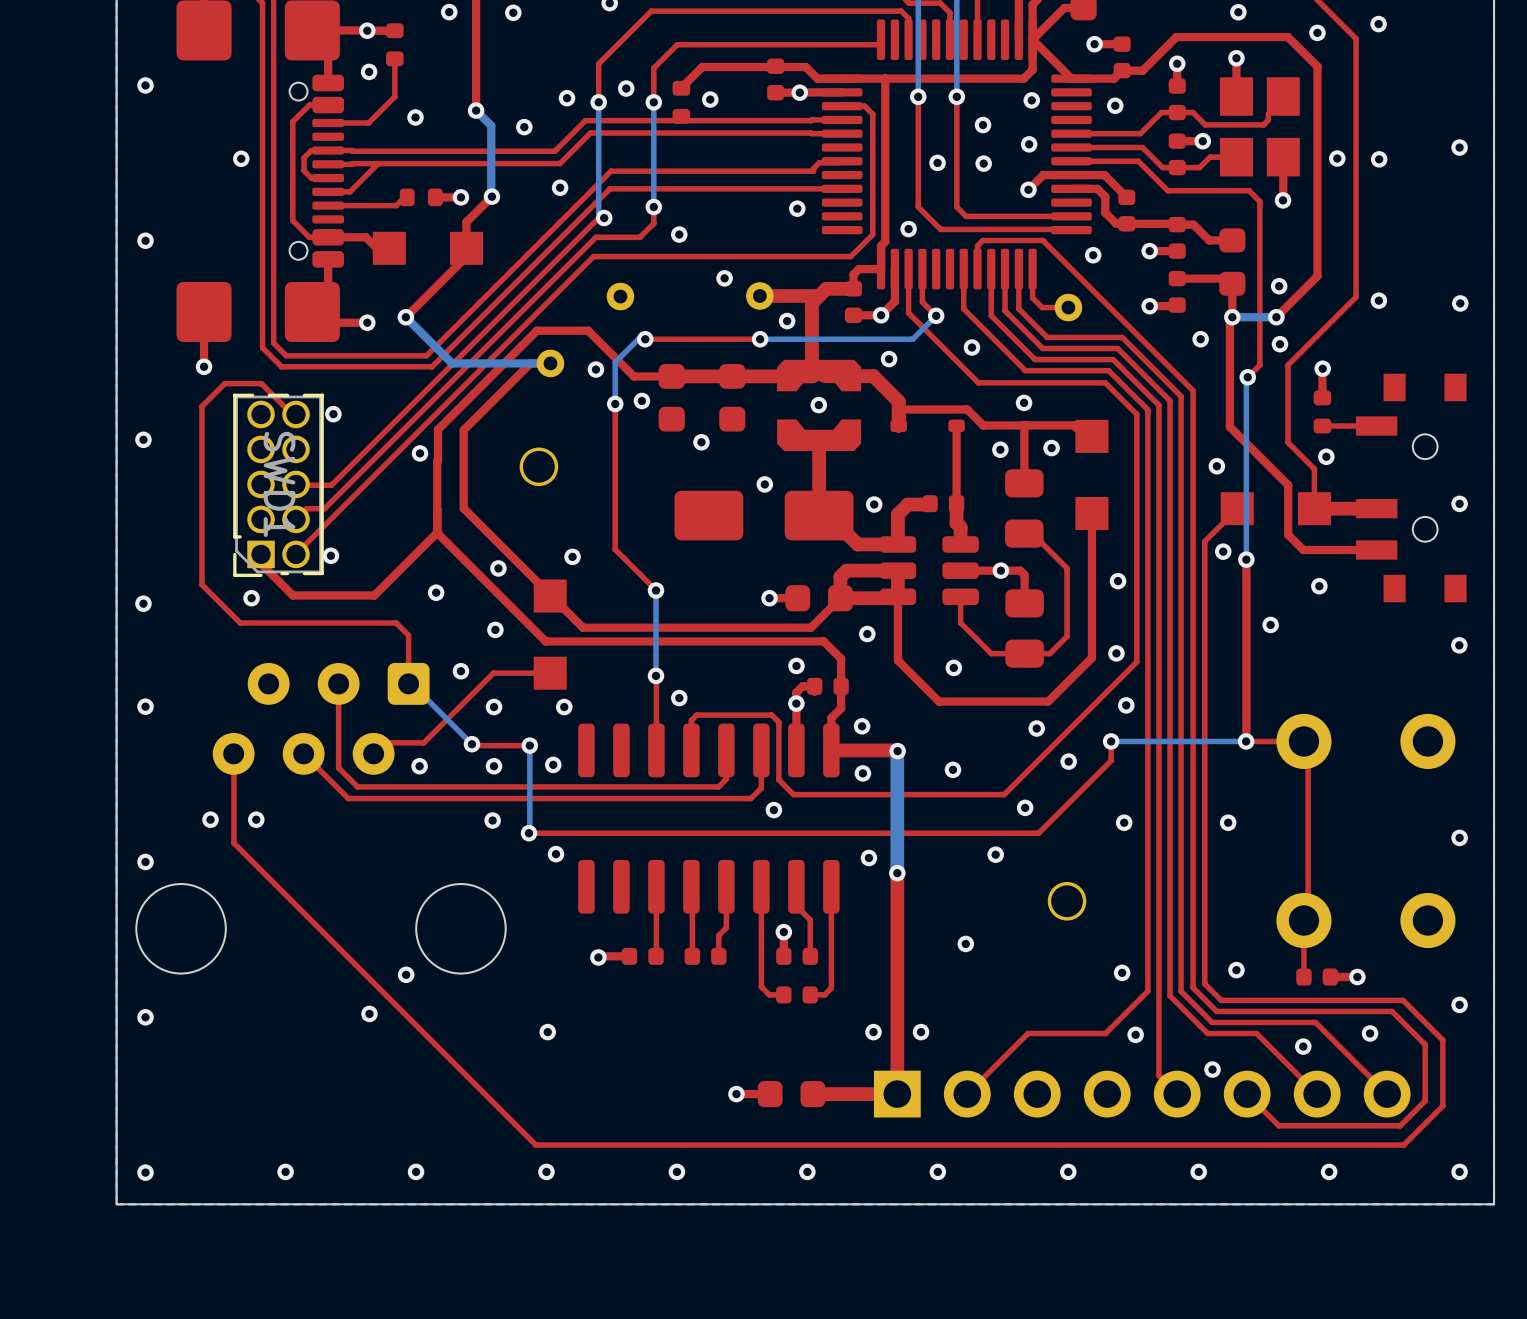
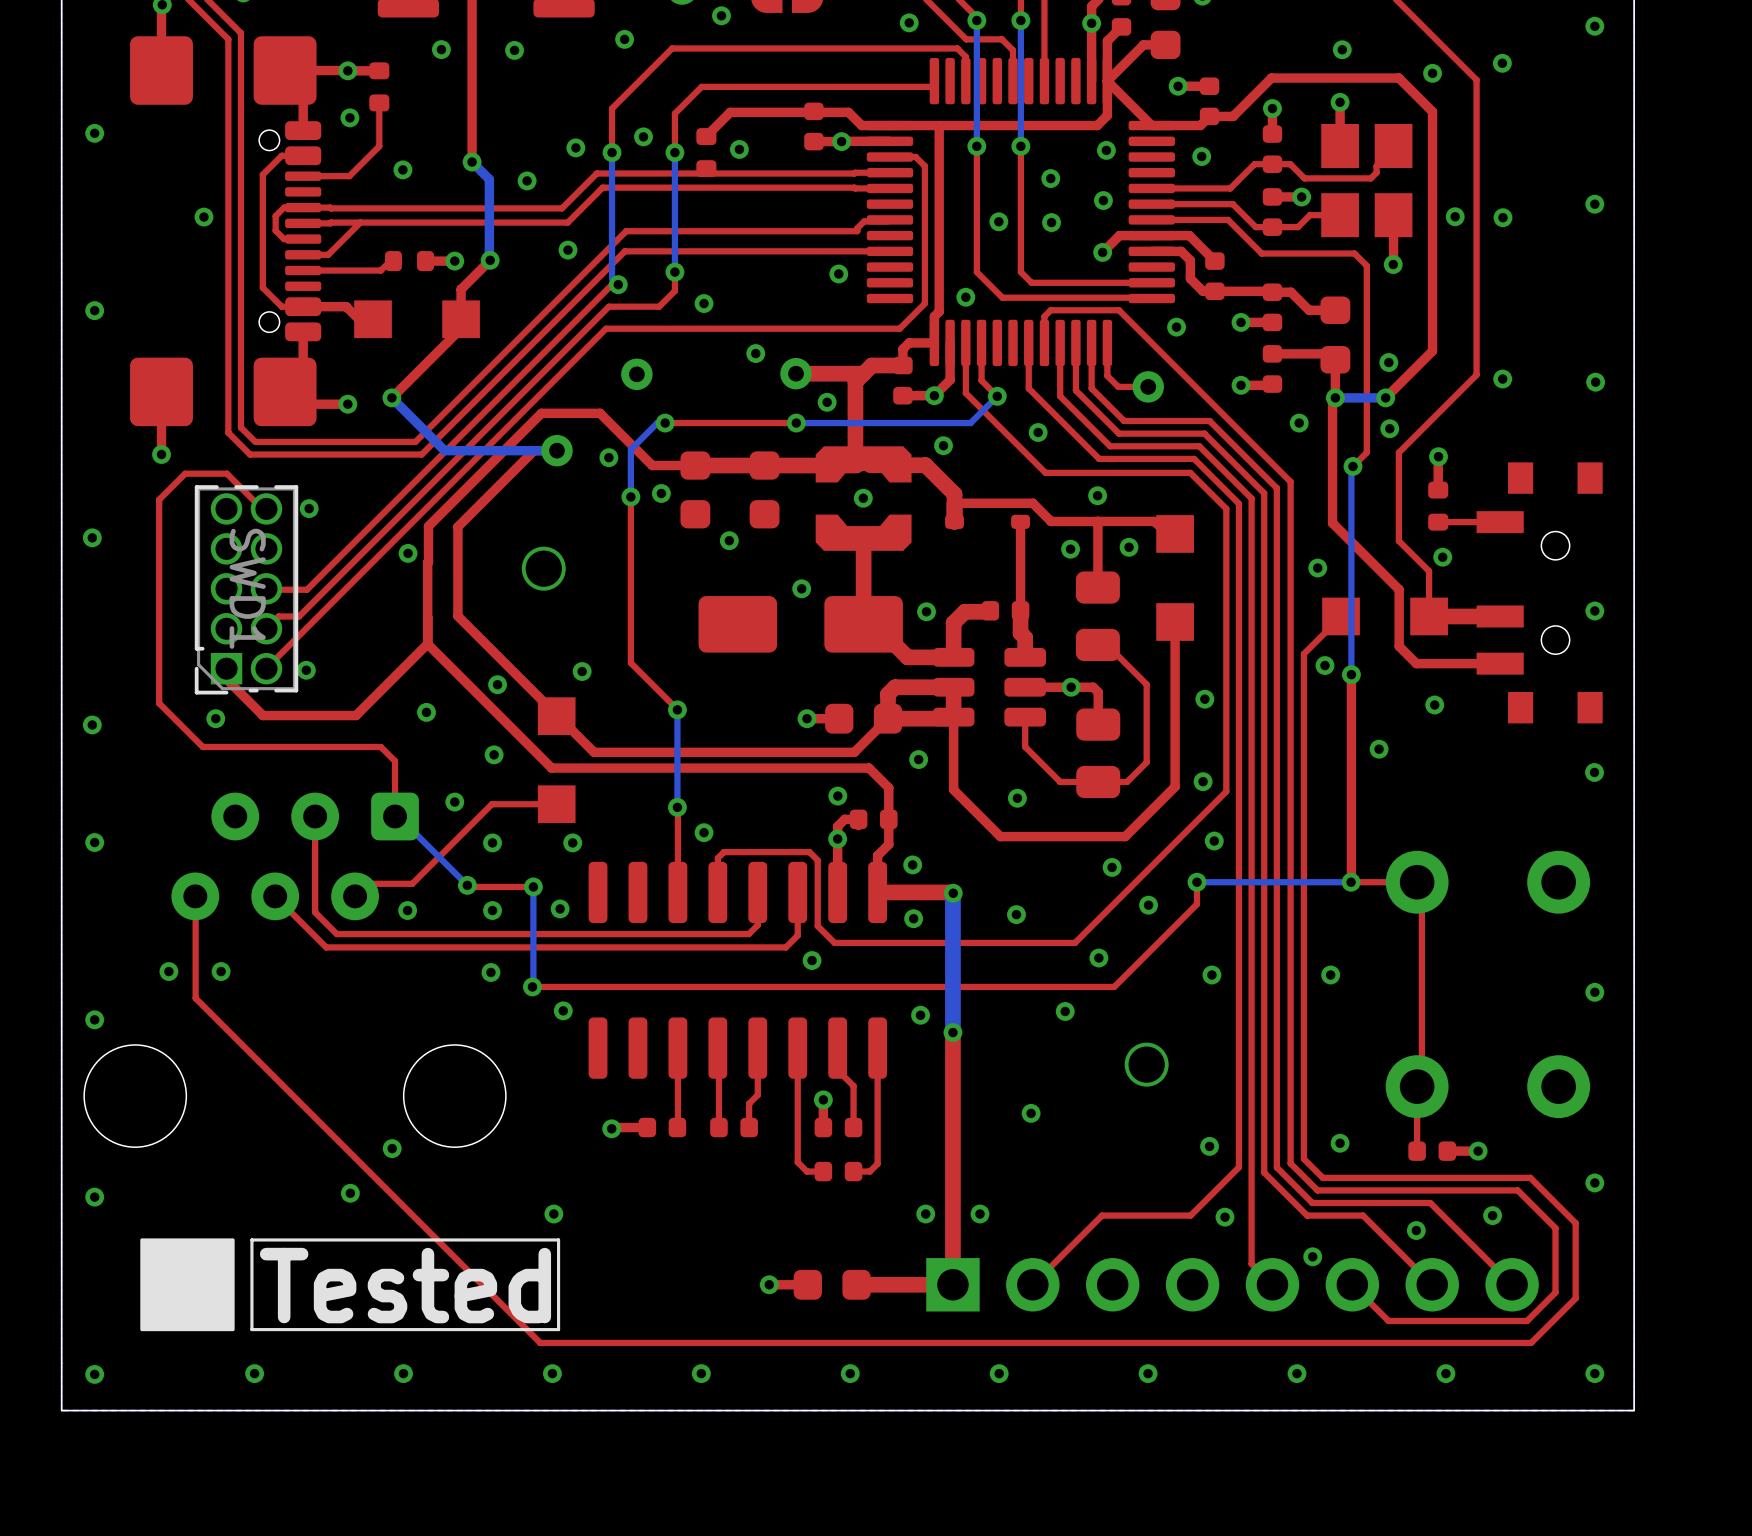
drawing: none -> [140, 1238, 235, 1332]
line: none -> (558, 1239) (251, 1239) (251, 1329) (558, 1329) (558, 1239)
text: none -> Tested (405, 1285)

